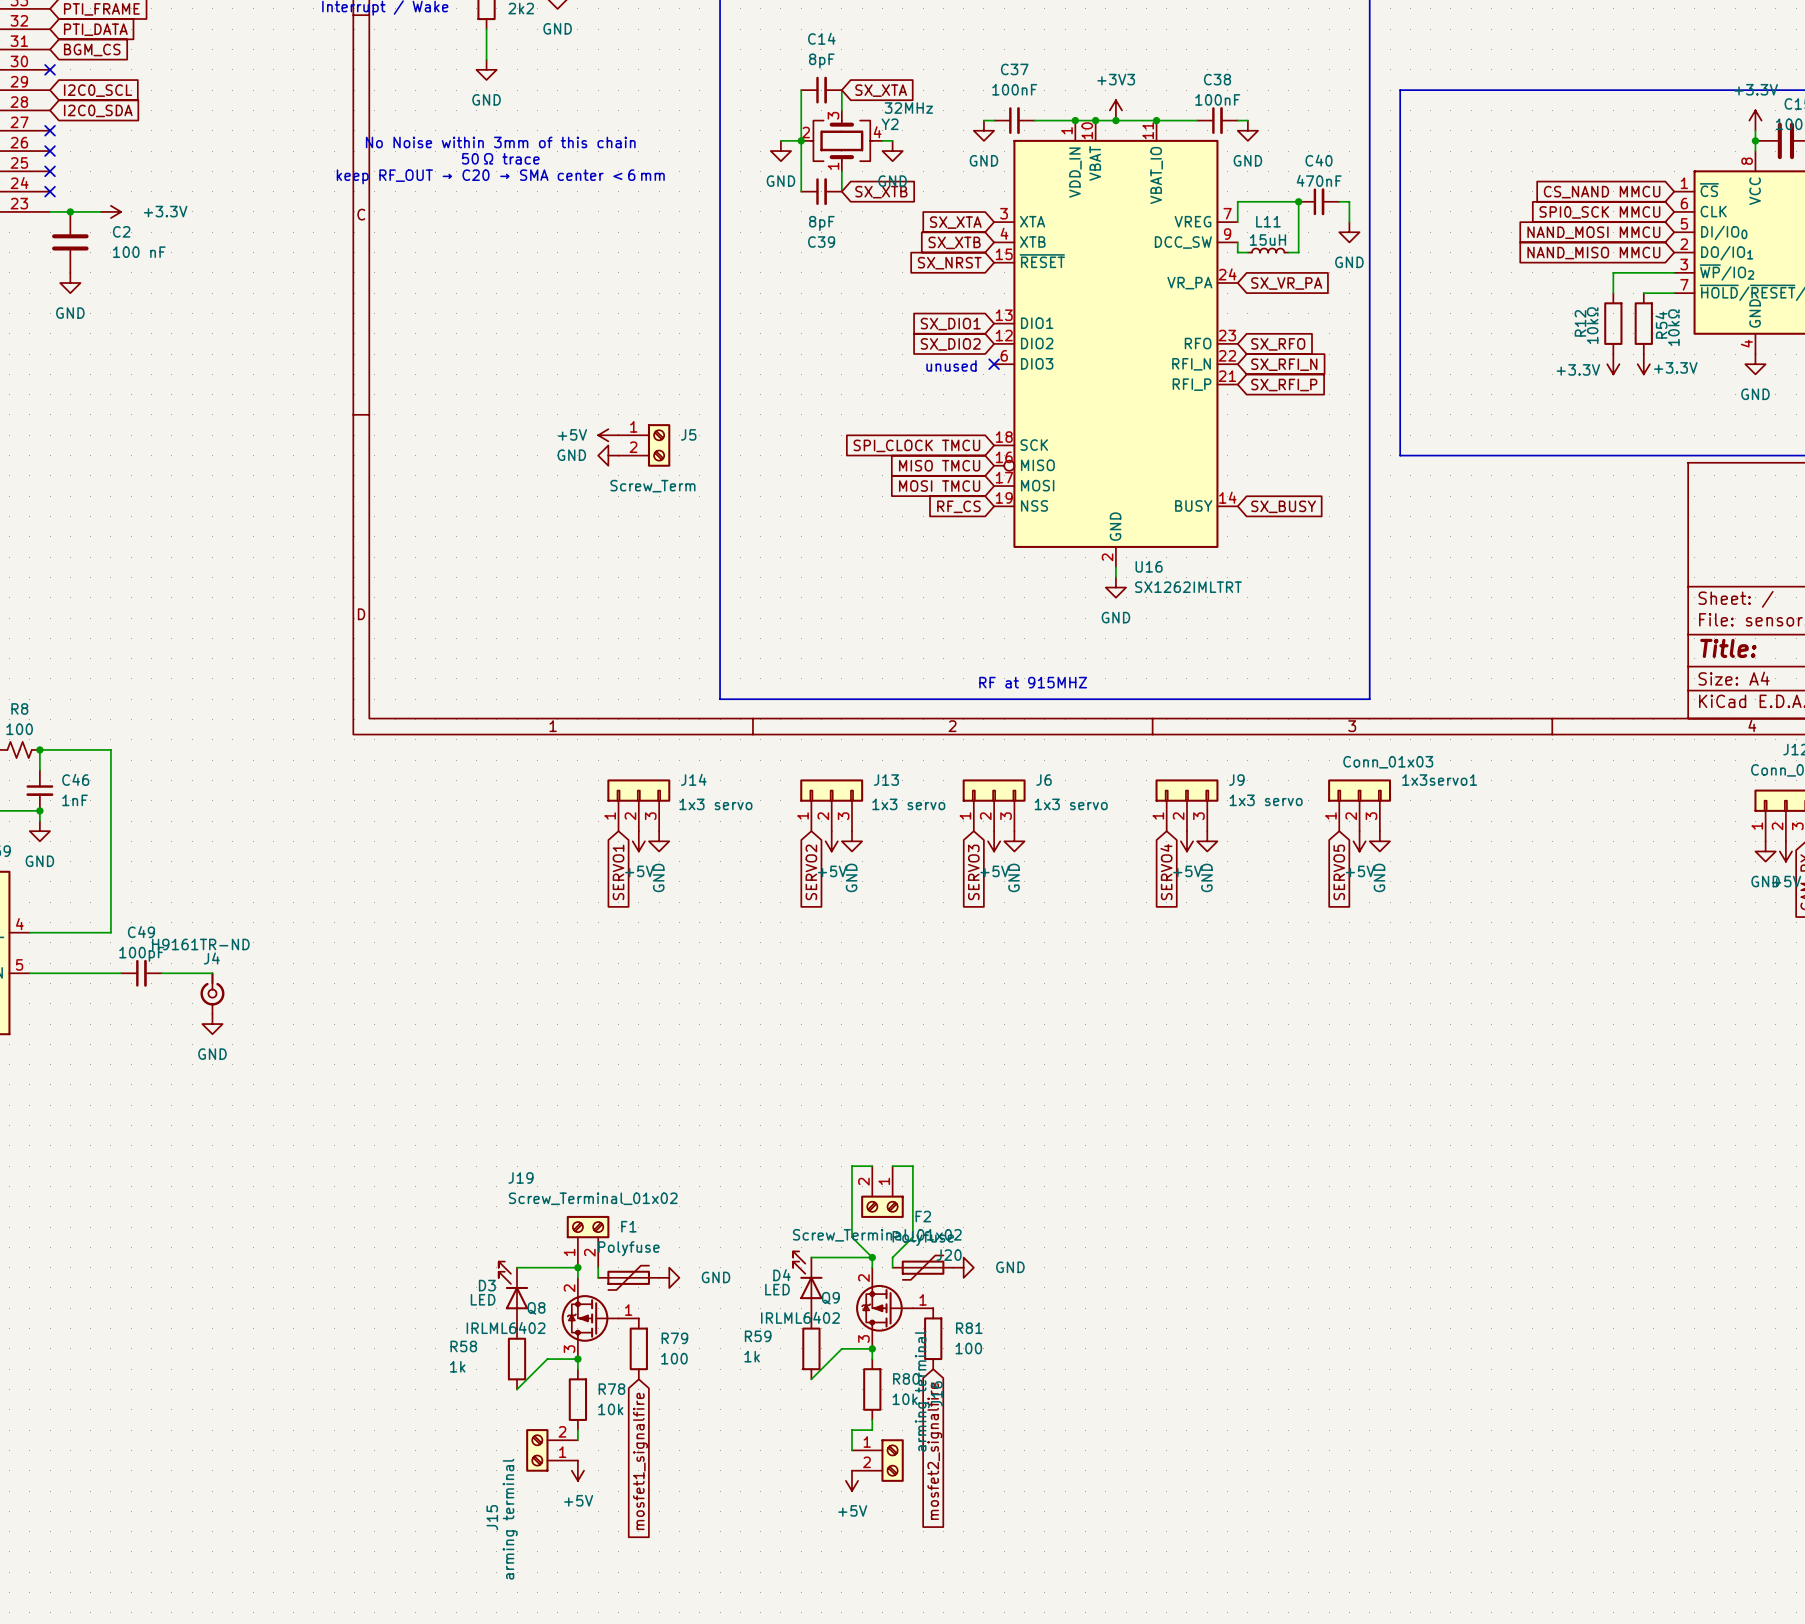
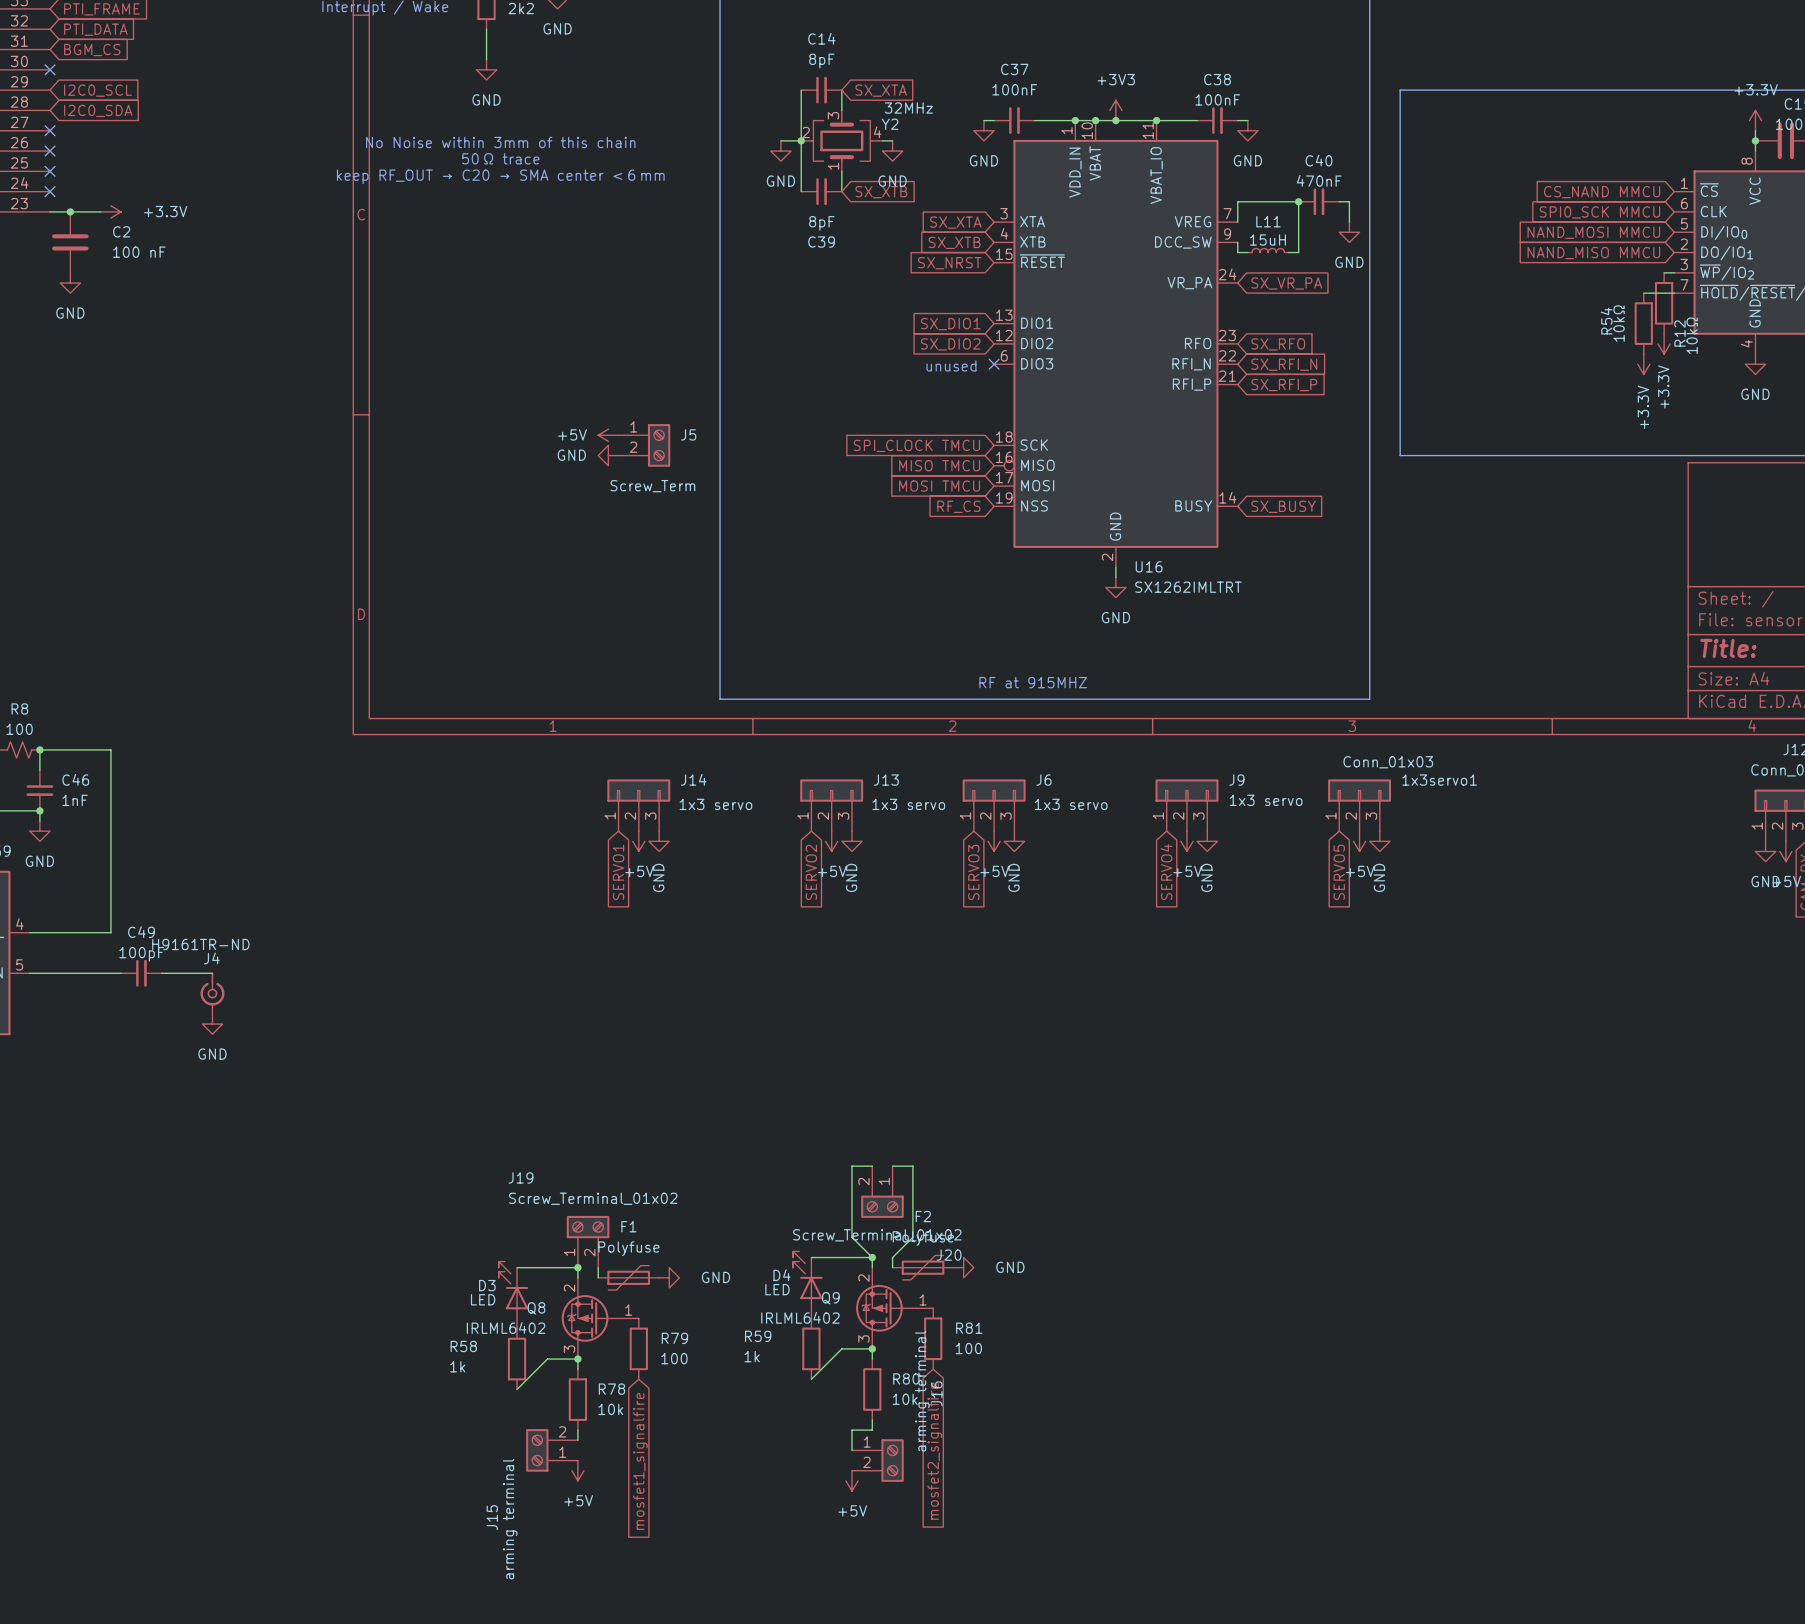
wire: (1664, 272) (1613, 272) (1613, 293) -> none
R12 name position: R12 (1580, 323) -> R12 (1679, 333)
R12 position: (1613, 323) -> (1664, 303)
R12 value position: 10kΩ (1592, 325) -> 10kΩ (1692, 335)
R54 name position: R54 (1661, 325) -> R54 (1606, 321)
R54 value position: 10kΩ (1673, 327) -> 10kΩ (1619, 323)
power symbol position: +3.3V (1613, 364) -> +3.3V (1664, 343)
power symbol text rotation: 0° (1675, 367) -> 90° counterclockwise (1643, 407)
power symbol text rotation: 0° (1578, 369) -> 90° counterclockwise (1663, 387)
power symbol text position: +3.3V (1578, 369) -> +3.3V (1663, 387)

